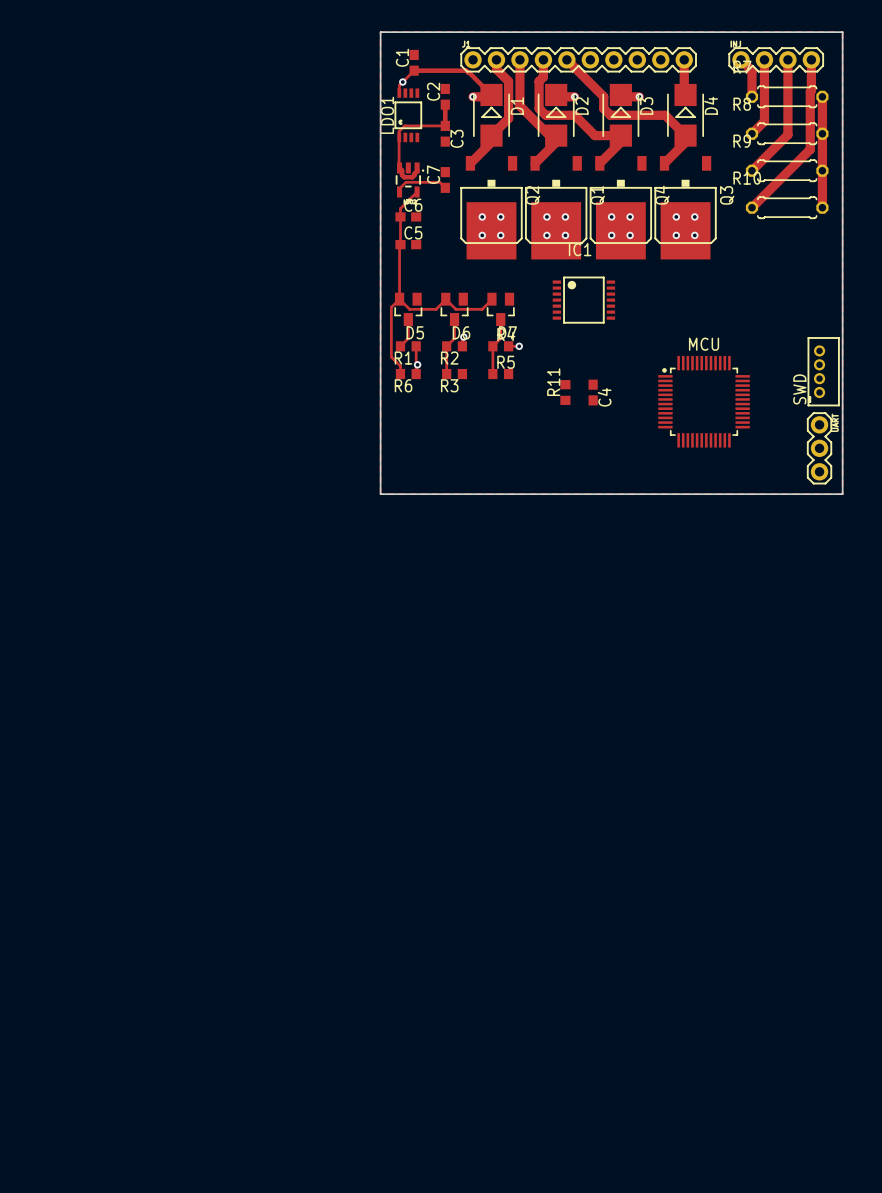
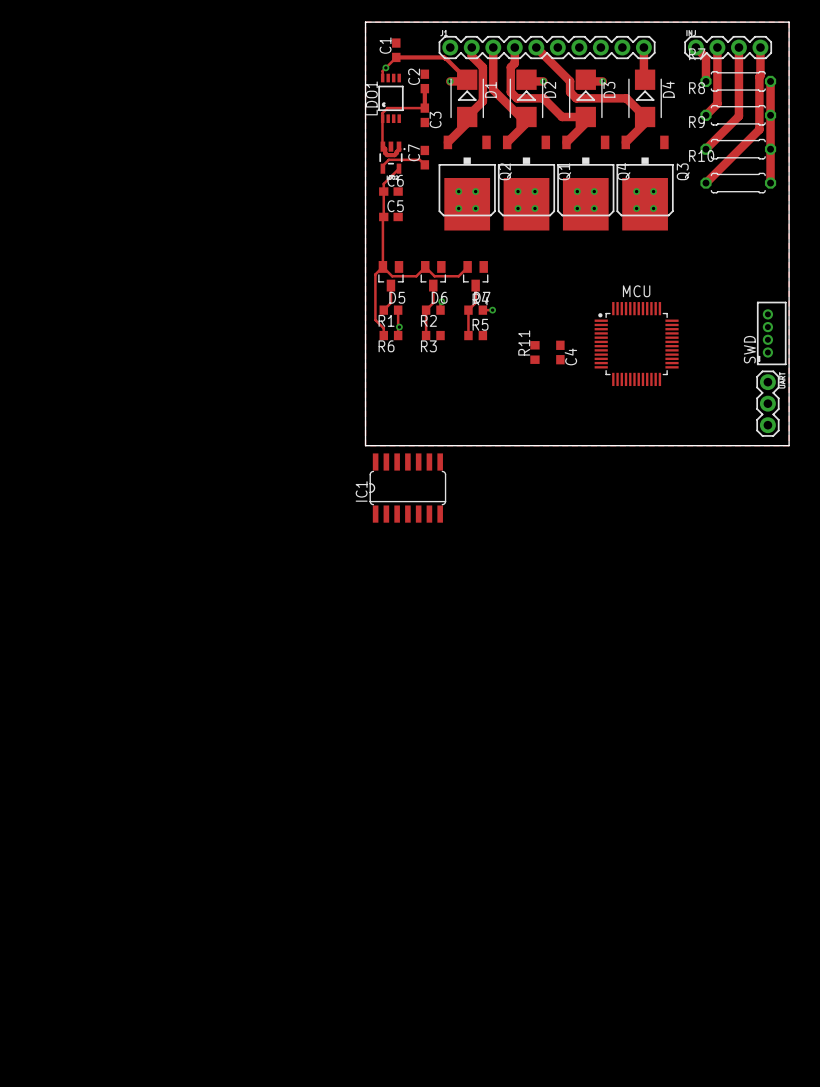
IC1 name position: IC1 (580, 249) -> IC1 (361, 491)
IC1 footprint: [552, 276, 616, 324] -> [369, 453, 447, 523]
MCU position: (704, 401) -> (636, 344)

